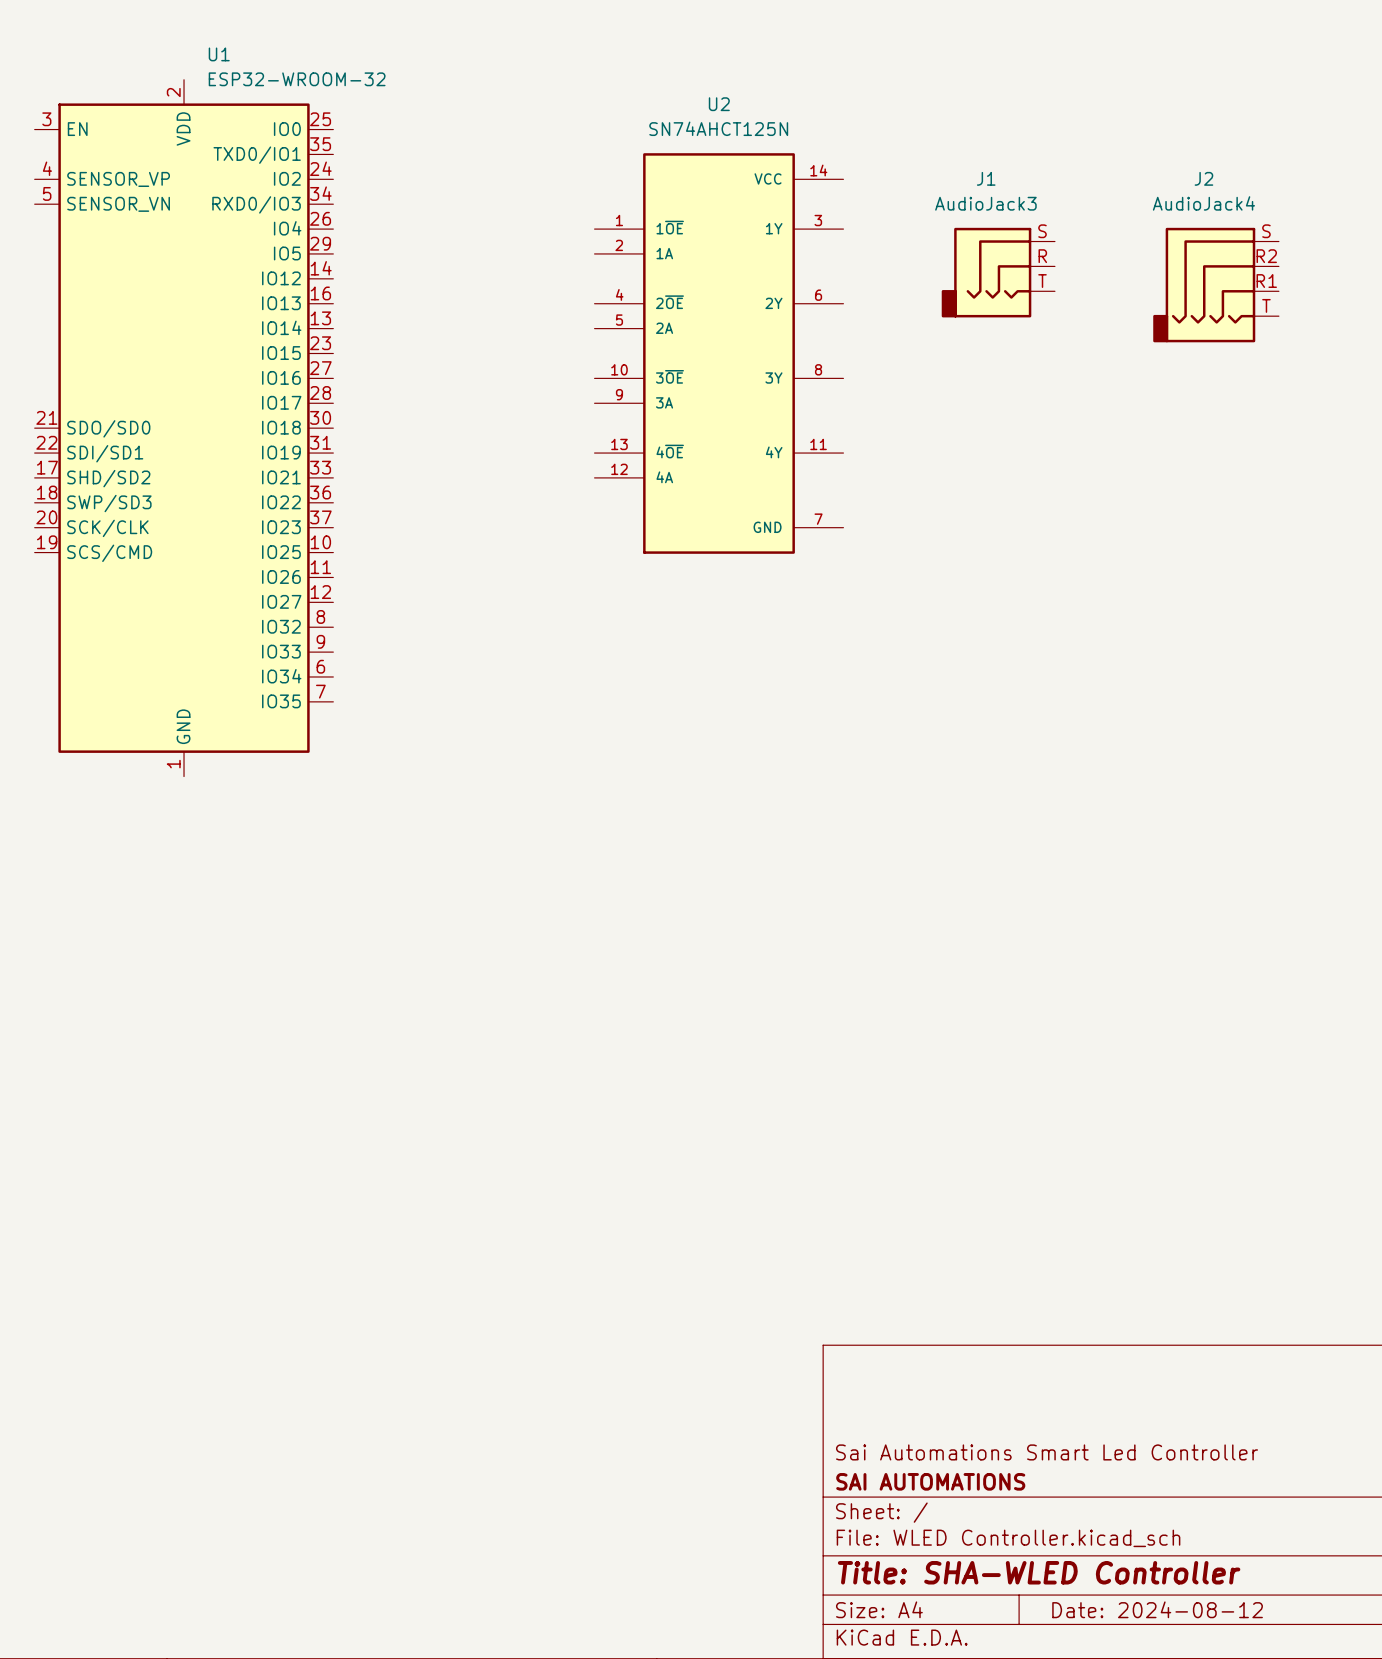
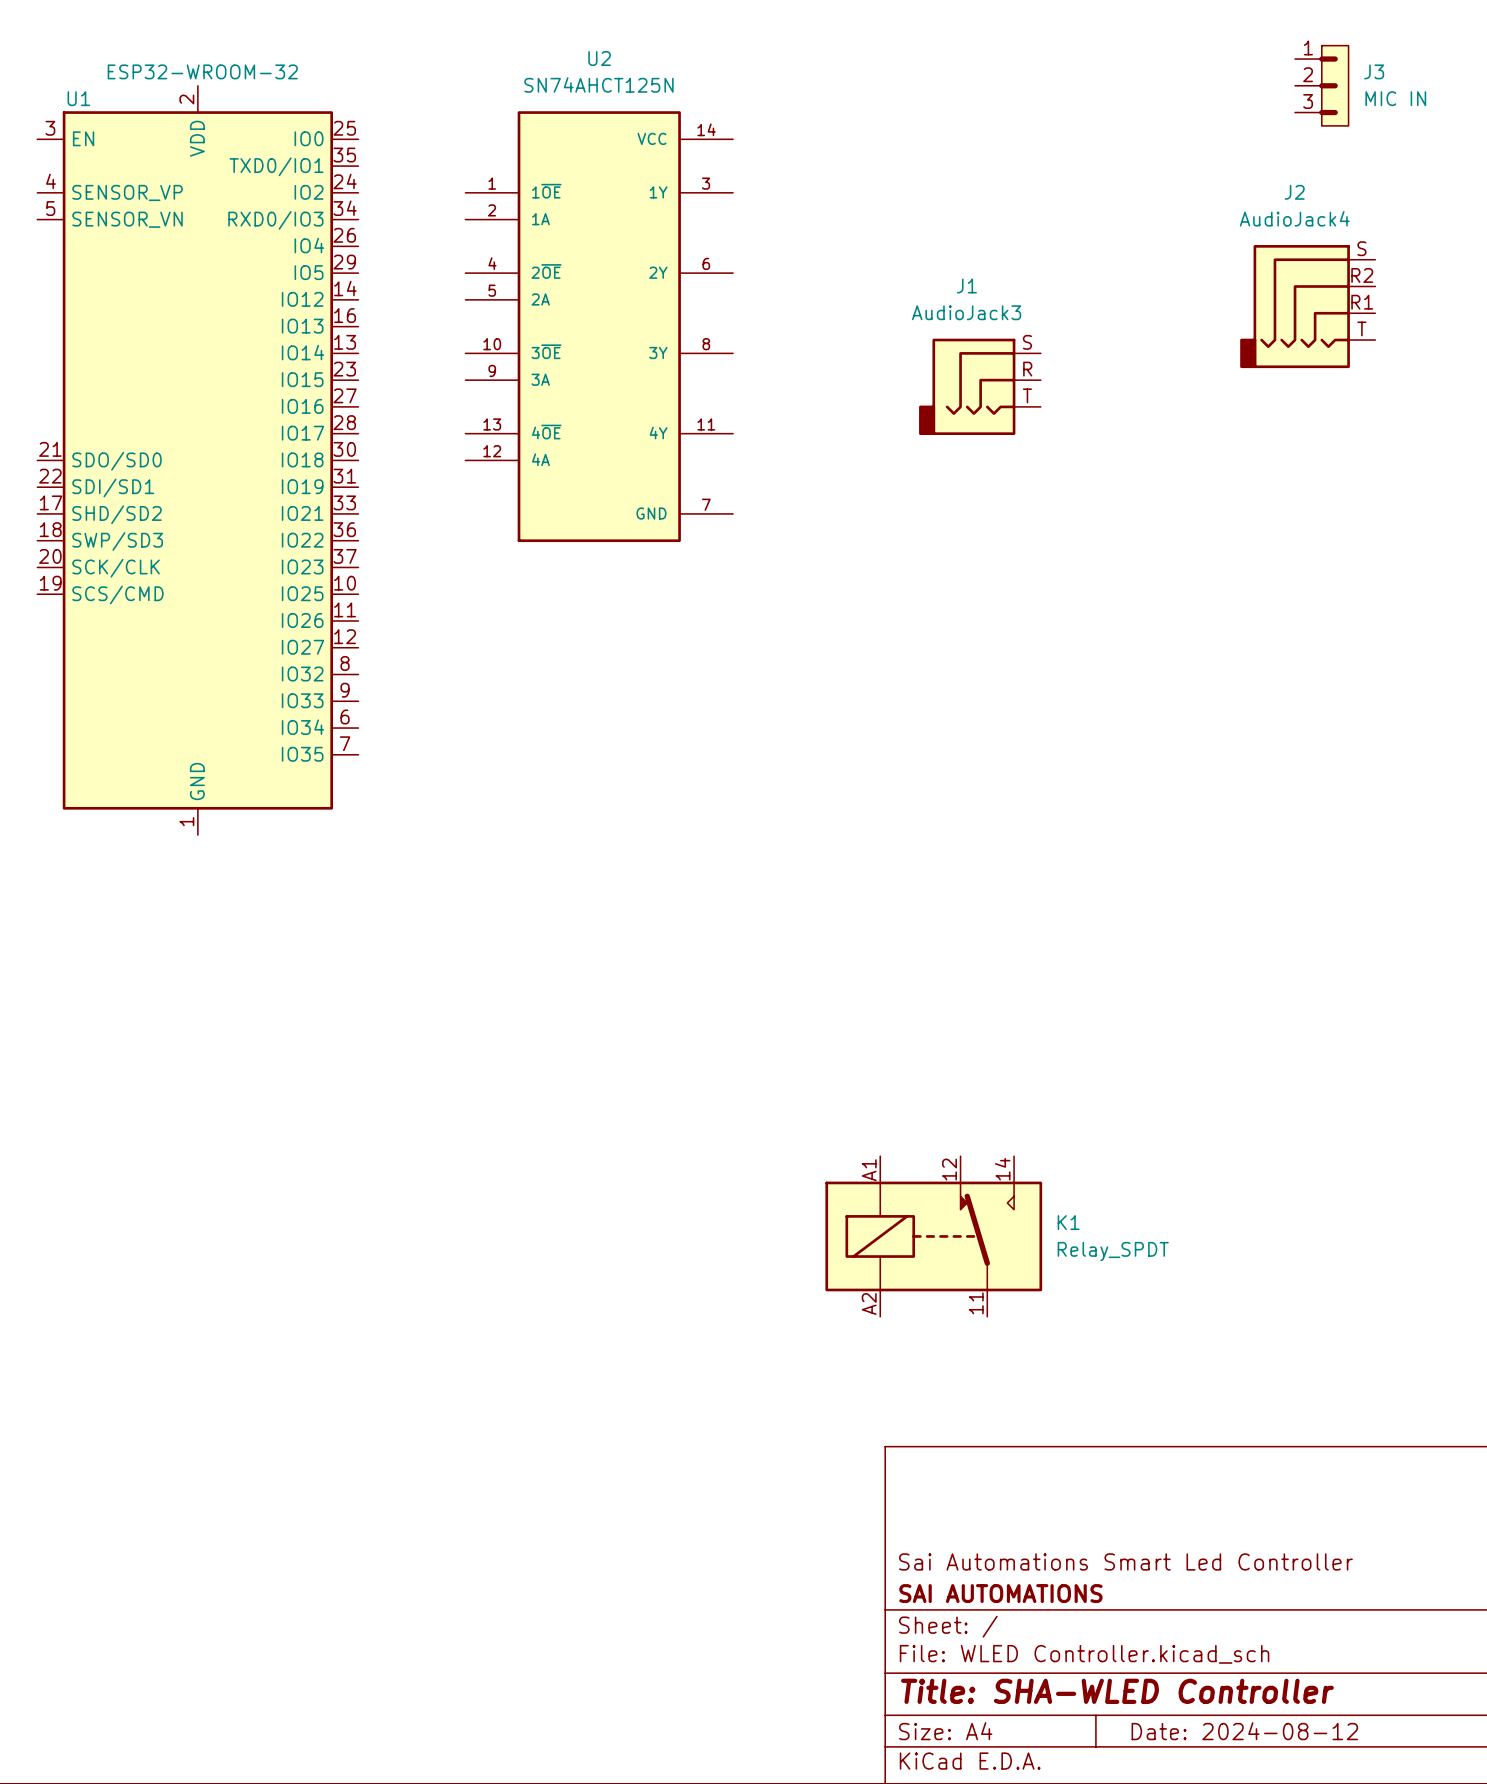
U1 name position: U1 (219, 54) -> U1 (78, 98)
U1 value position: ESP32-WROOM-32 (297, 79) -> ESP32-WROOM-32 (202, 71)
J3: none -> MIC IN (1321, 85)
J1 position: (998, 272) -> (979, 386)
U2 position: (719, 353) -> (599, 326)
K1: none -> Relay_SPDT (933, 1236)

